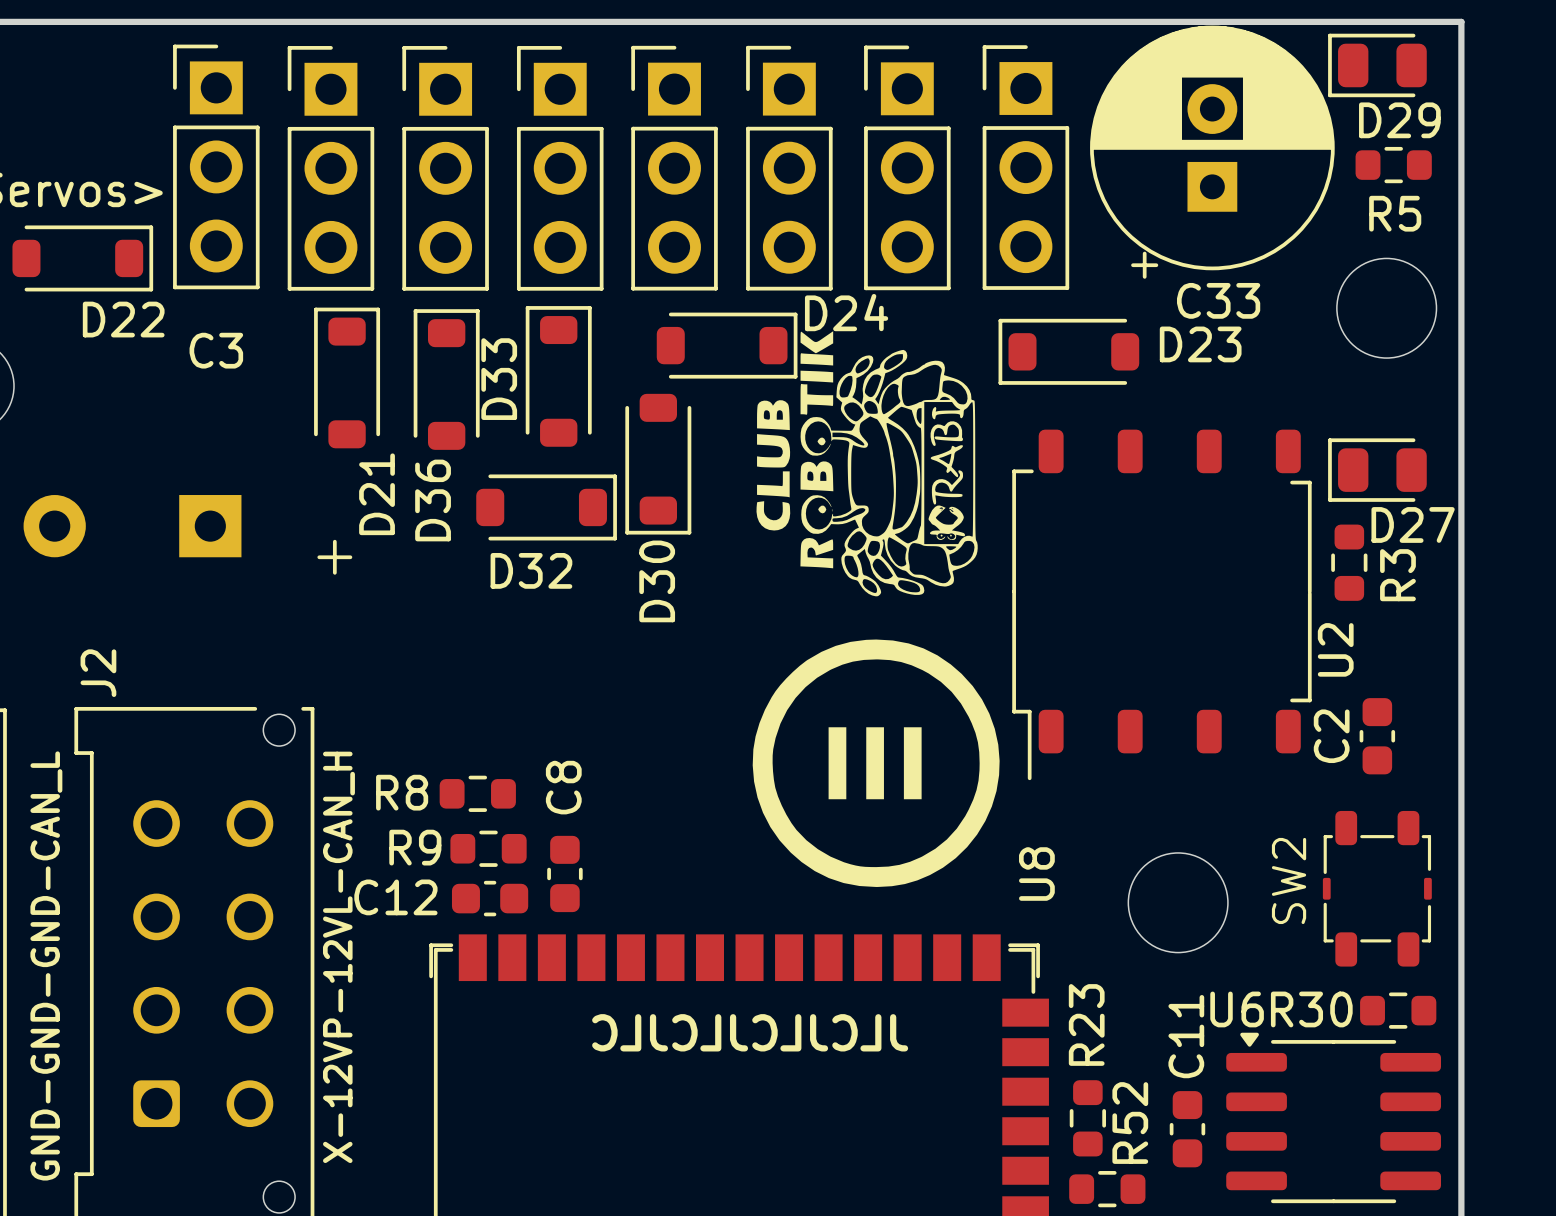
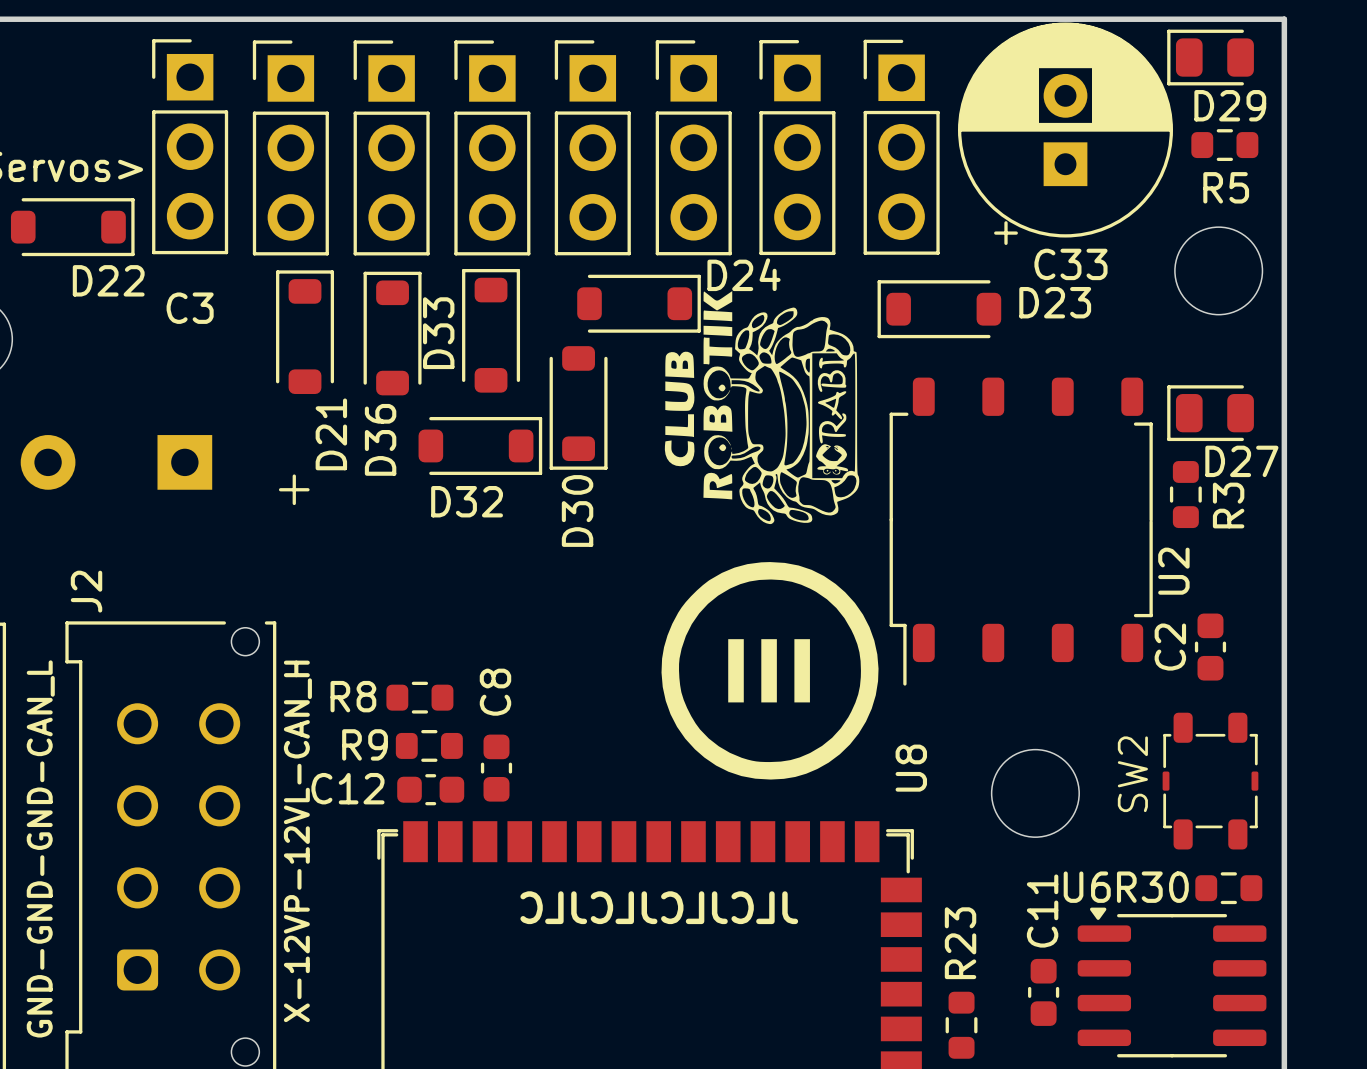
R23 position: (1087, 1118) -> (961, 1025)
R52: (1107, 1189) -> none

